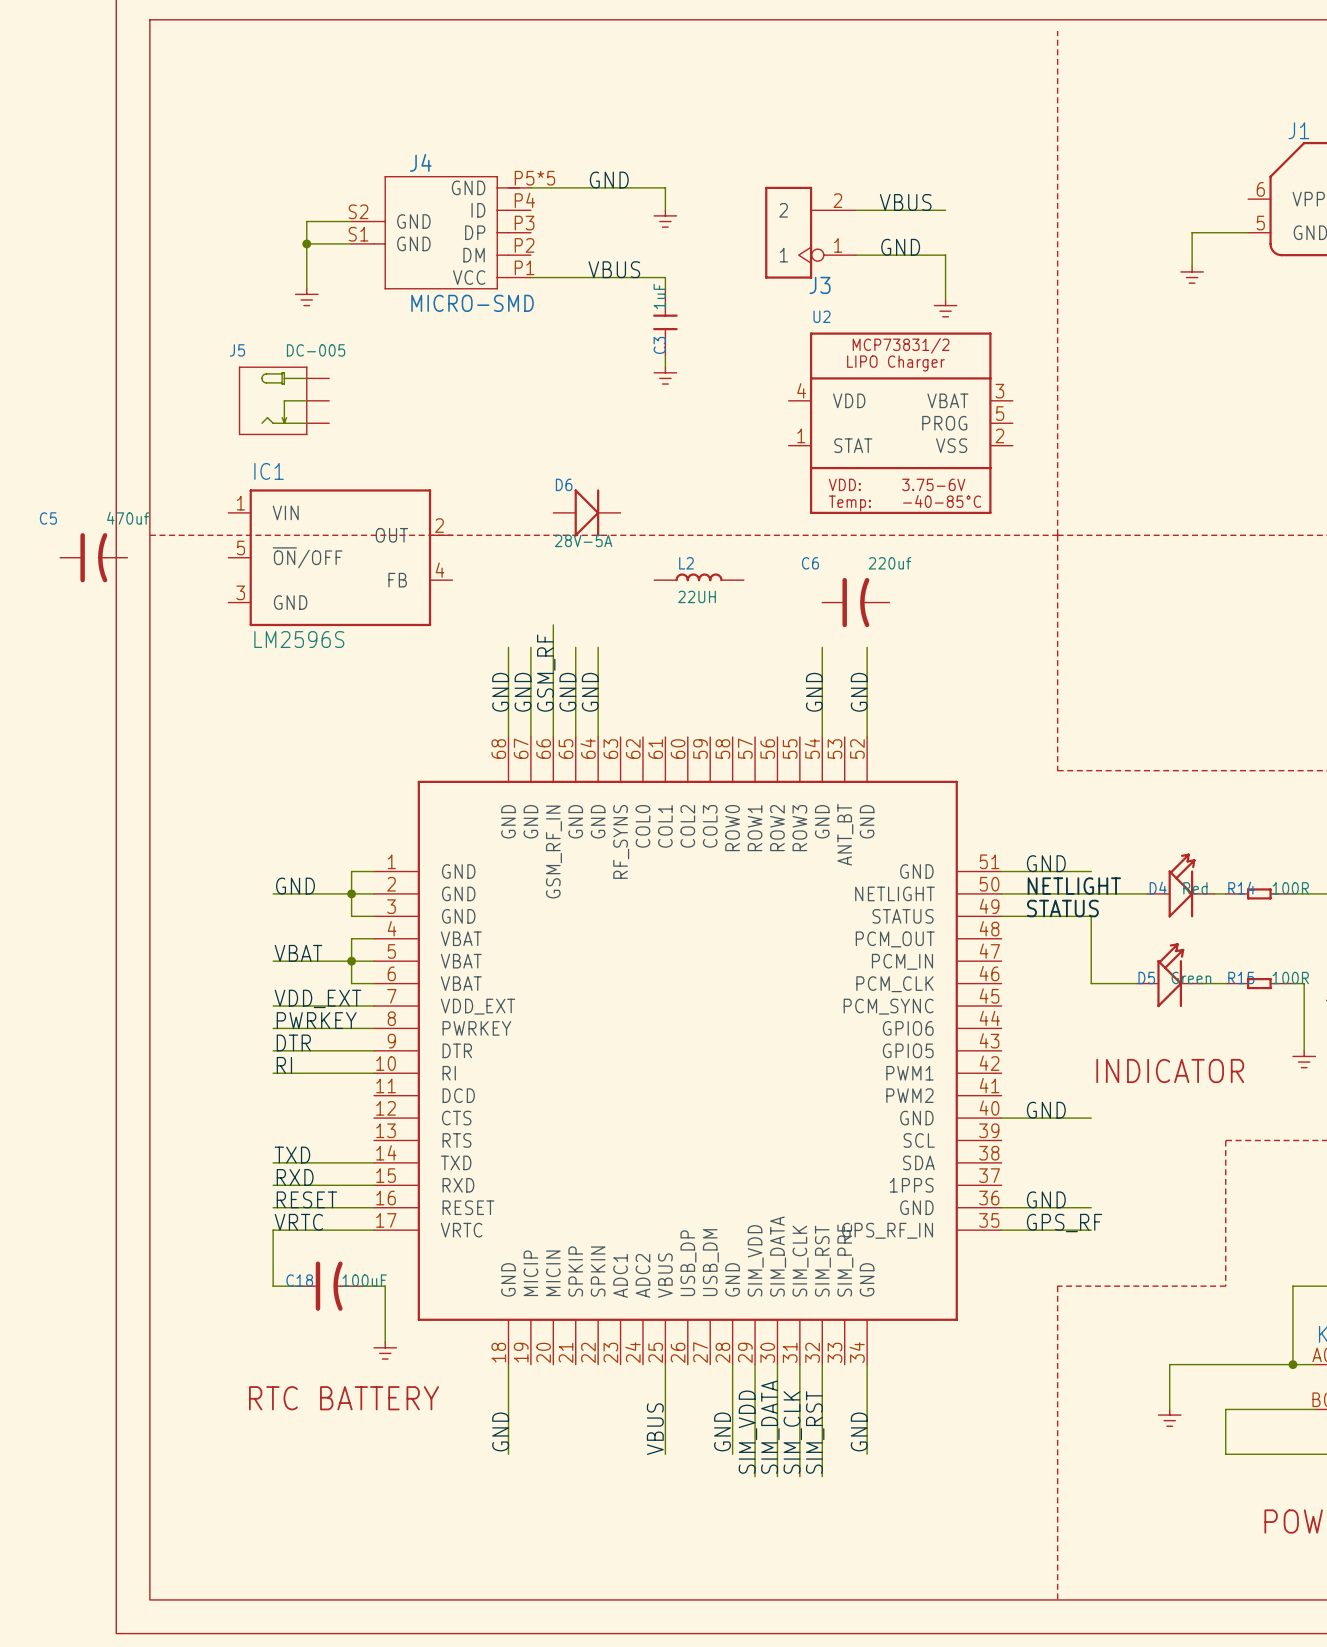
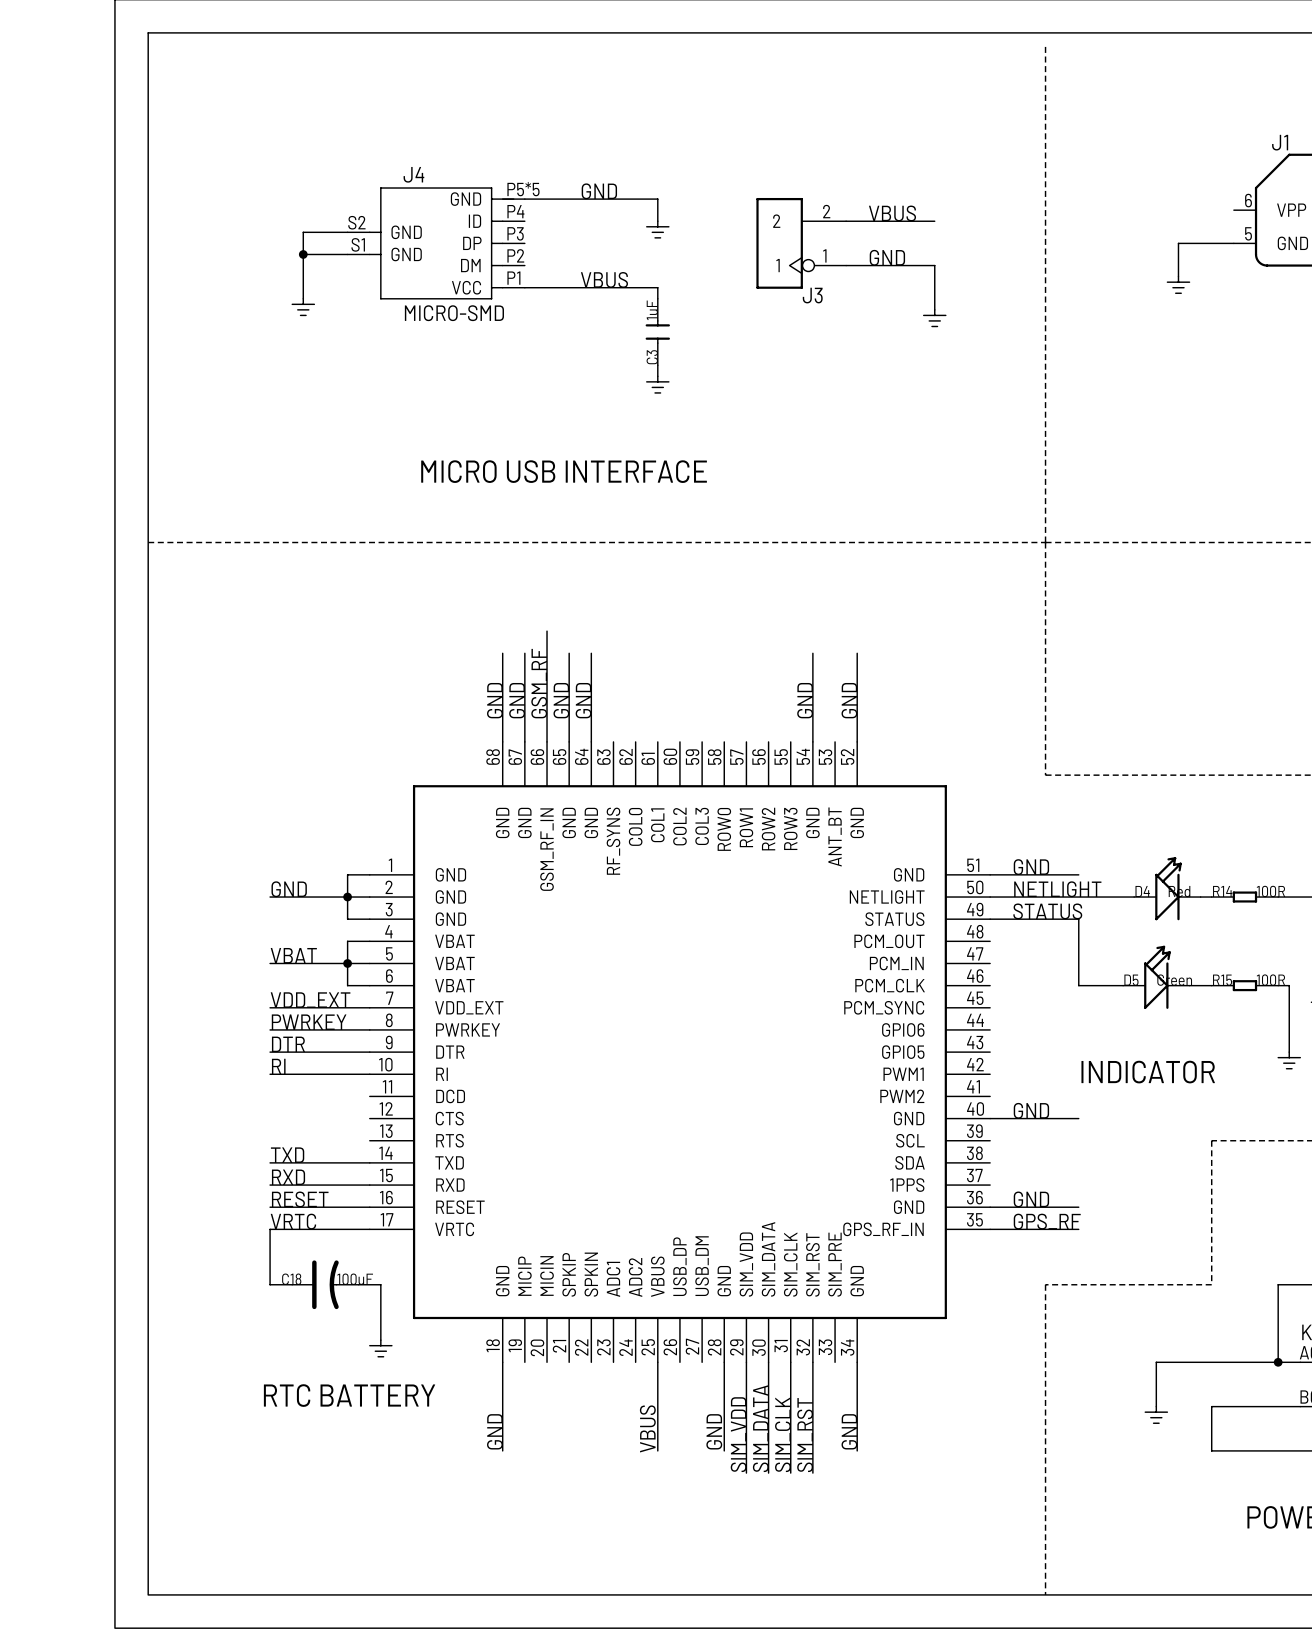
J5: DC-005 (284, 400) -> none
U2: (900, 423) -> none
text: none -> MICRO USB INTERFACE (564, 471)
D6: 28V-5A (586, 512) -> none
C5: 470uf (93, 557) -> none
IC1: LM2596S (340, 557) -> none
L2: 22UH (699, 577) -> none
C6: 220uf (855, 602) -> none

